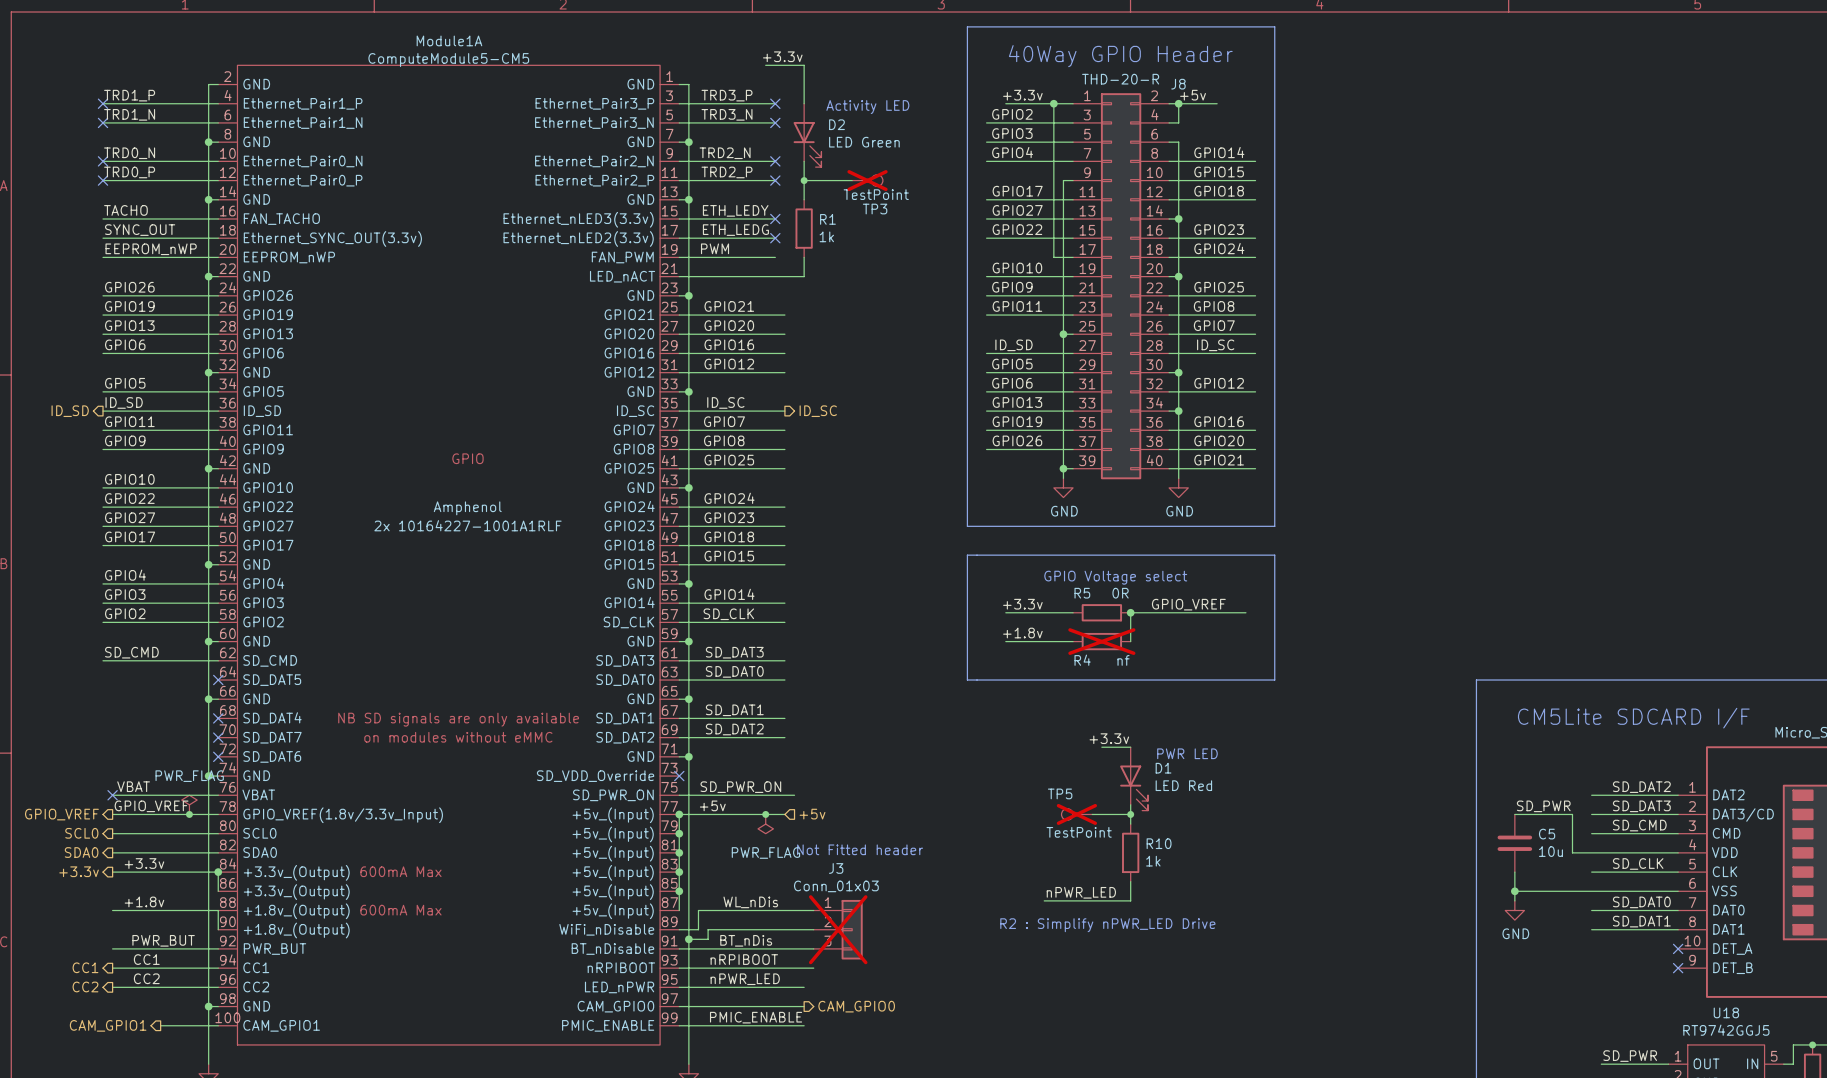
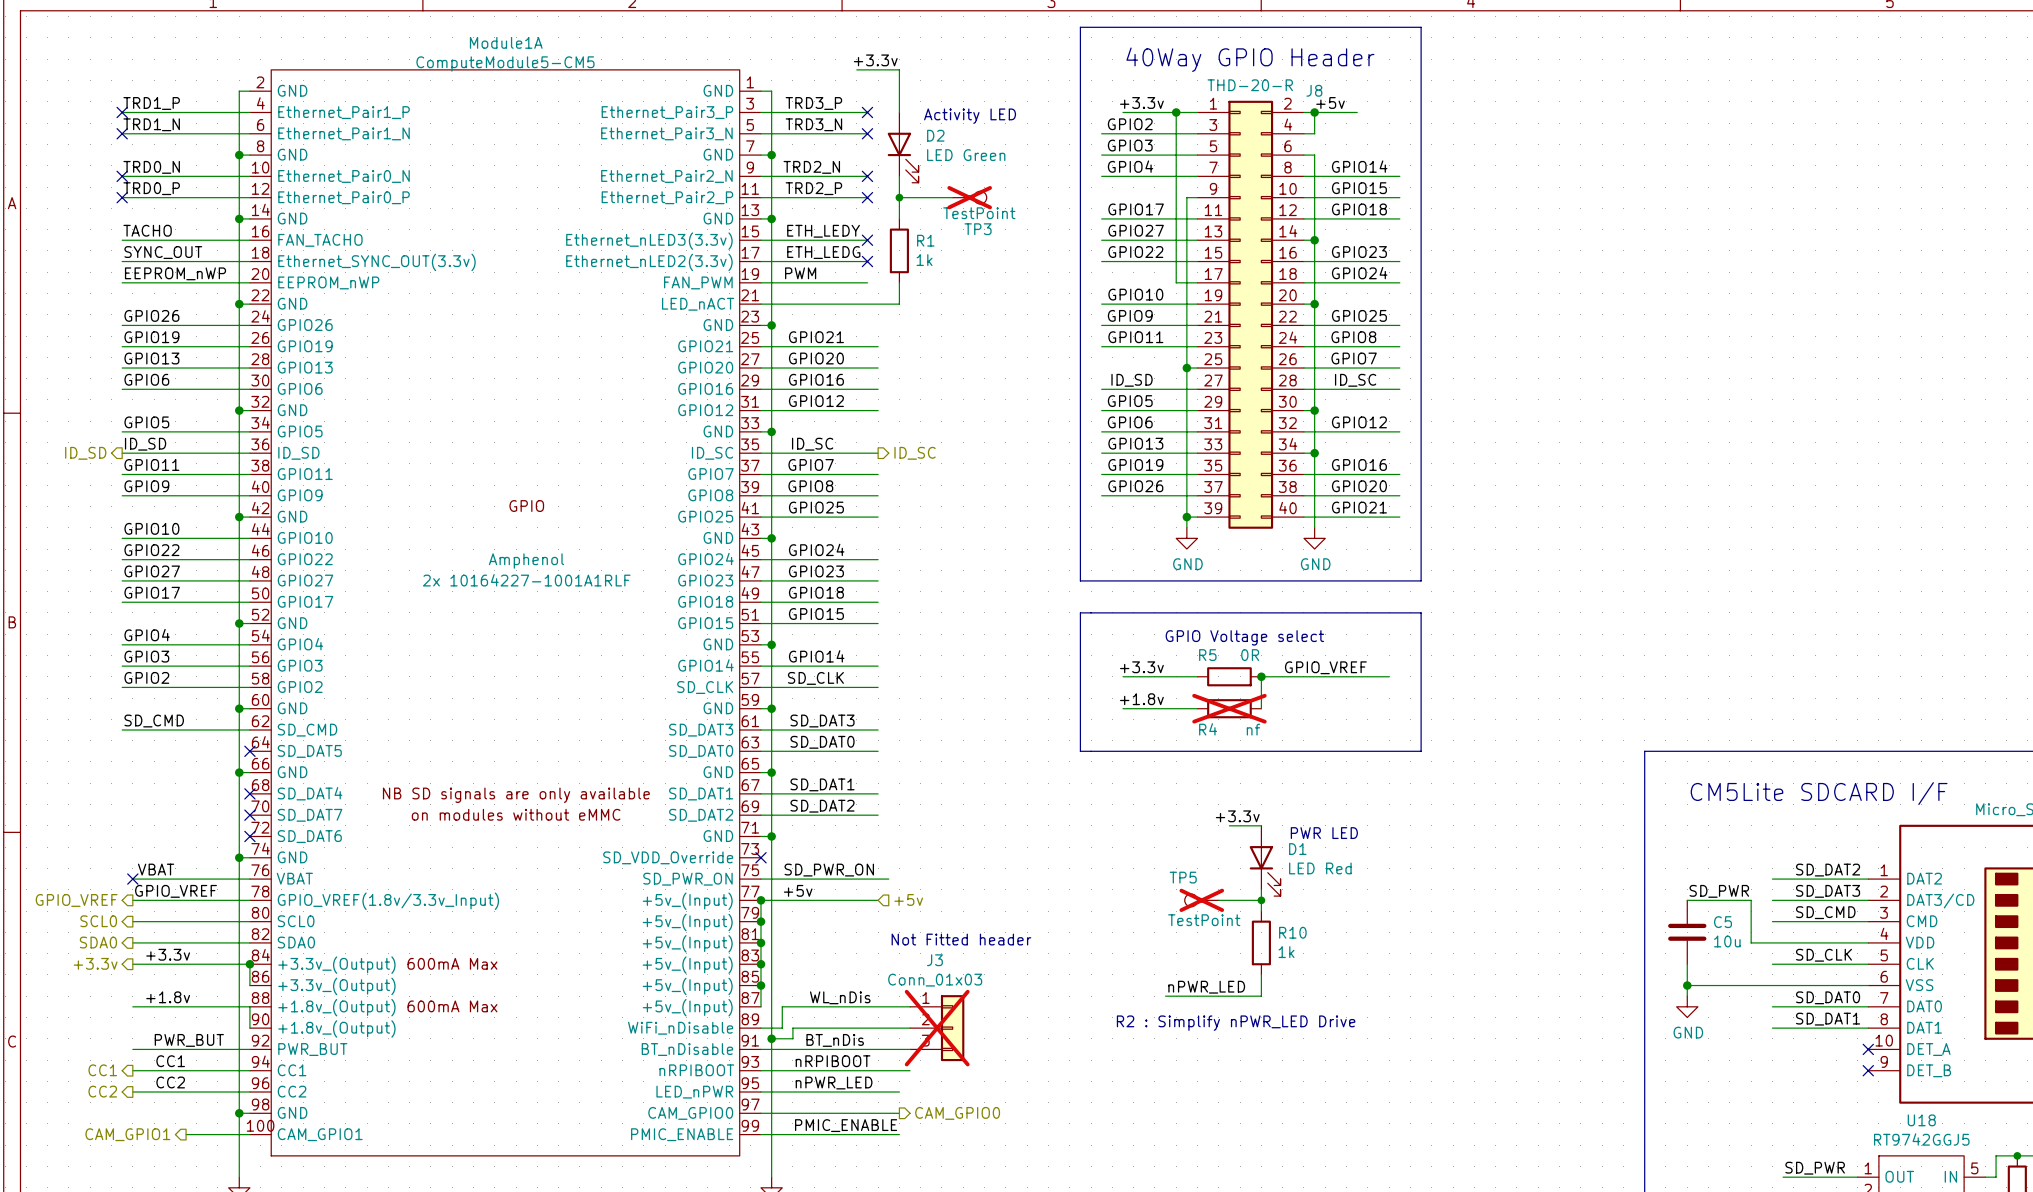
power symbol: PWR_FLAG (189, 804) -> none
junction: (189, 814) -> none
junction: (765, 814) -> none
power symbol: PWR_FLAG (765, 824) -> none

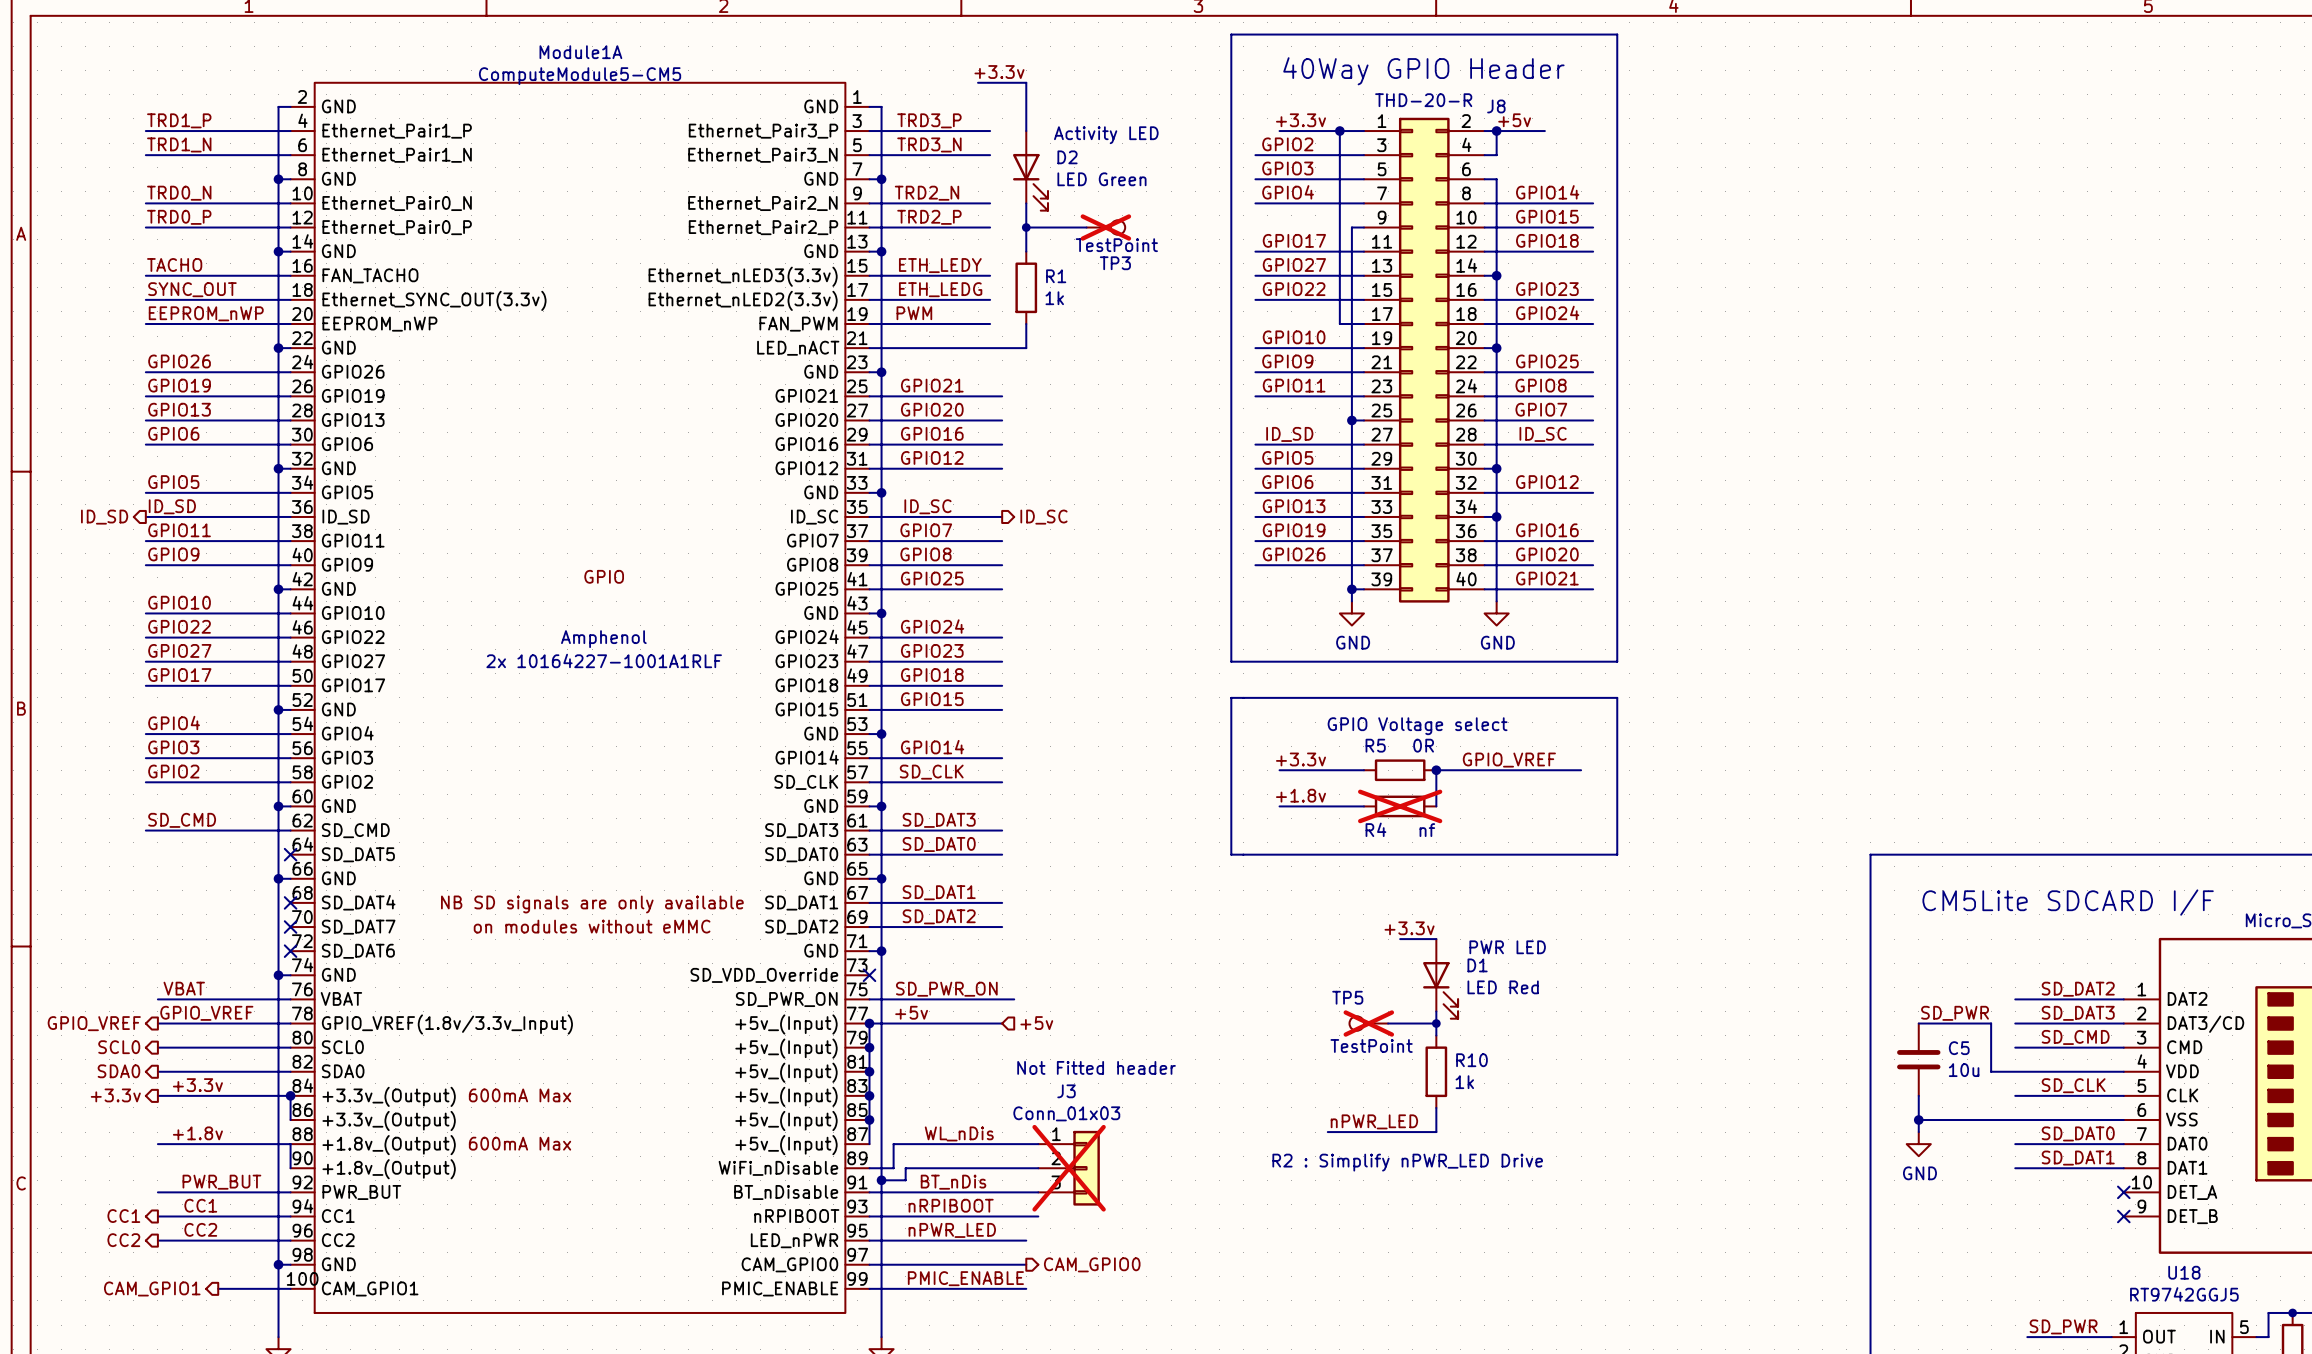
no-connect mark: (122, 112) -> none
no-connect mark: (867, 112) -> none
no-connect mark: (122, 133) -> none
no-connect mark: (867, 133) -> none
no-connect mark: (122, 176) -> none
no-connect mark: (867, 176) -> none
no-connect mark: (122, 197) -> none
no-connect mark: (867, 197) -> none
no-connect mark: (867, 240) -> none
no-connect mark: (867, 261) -> none
no-connect mark: (132, 879) -> none

